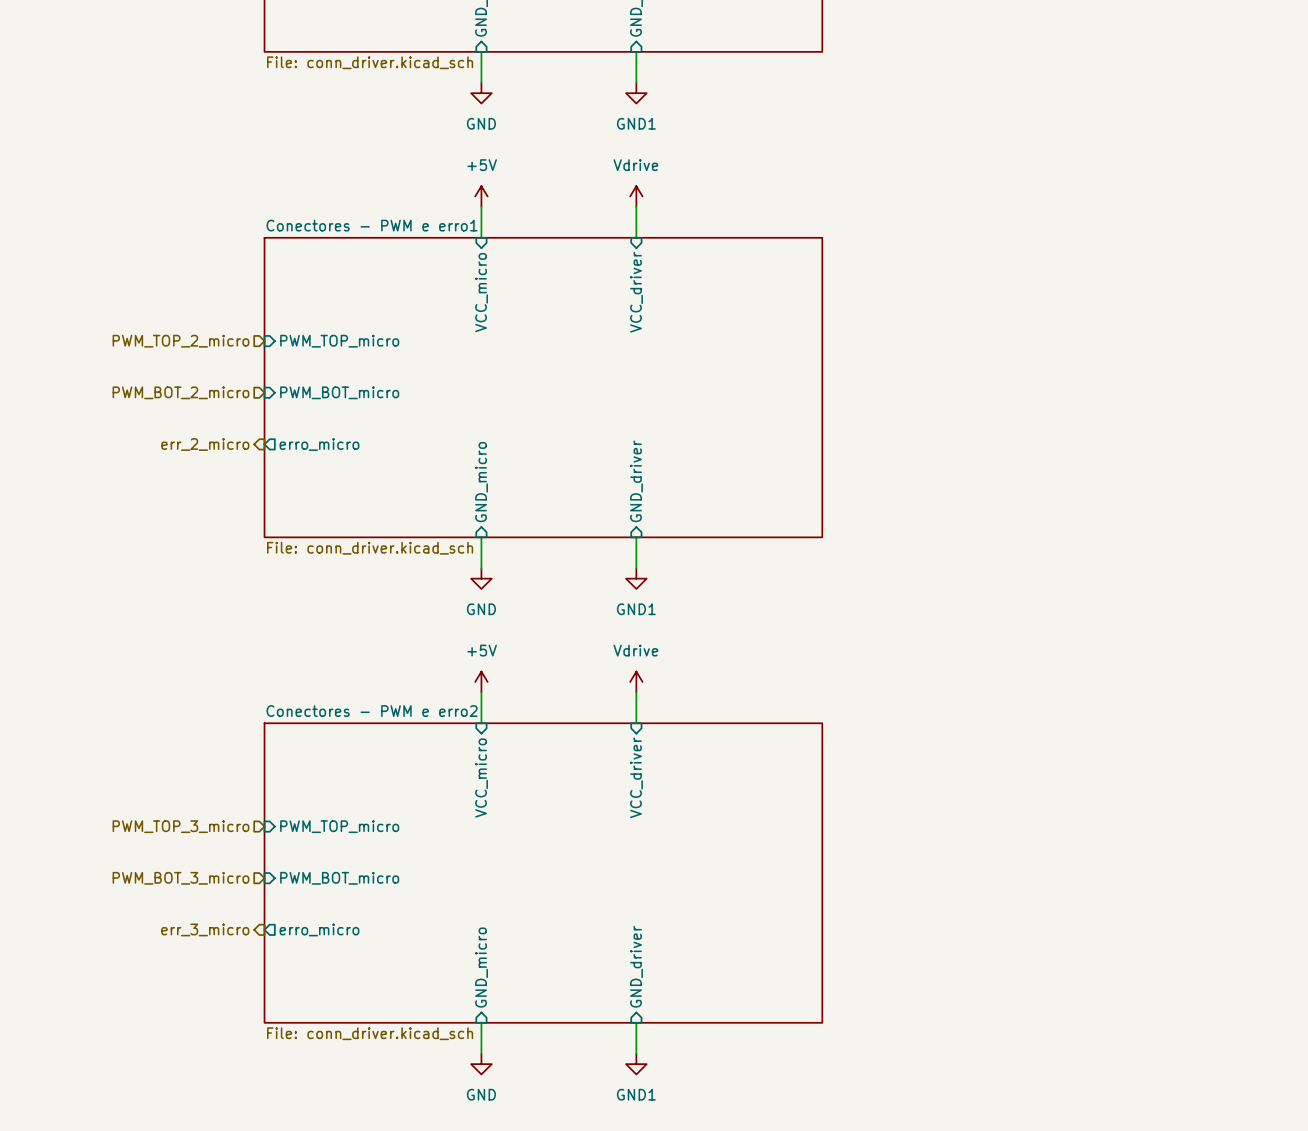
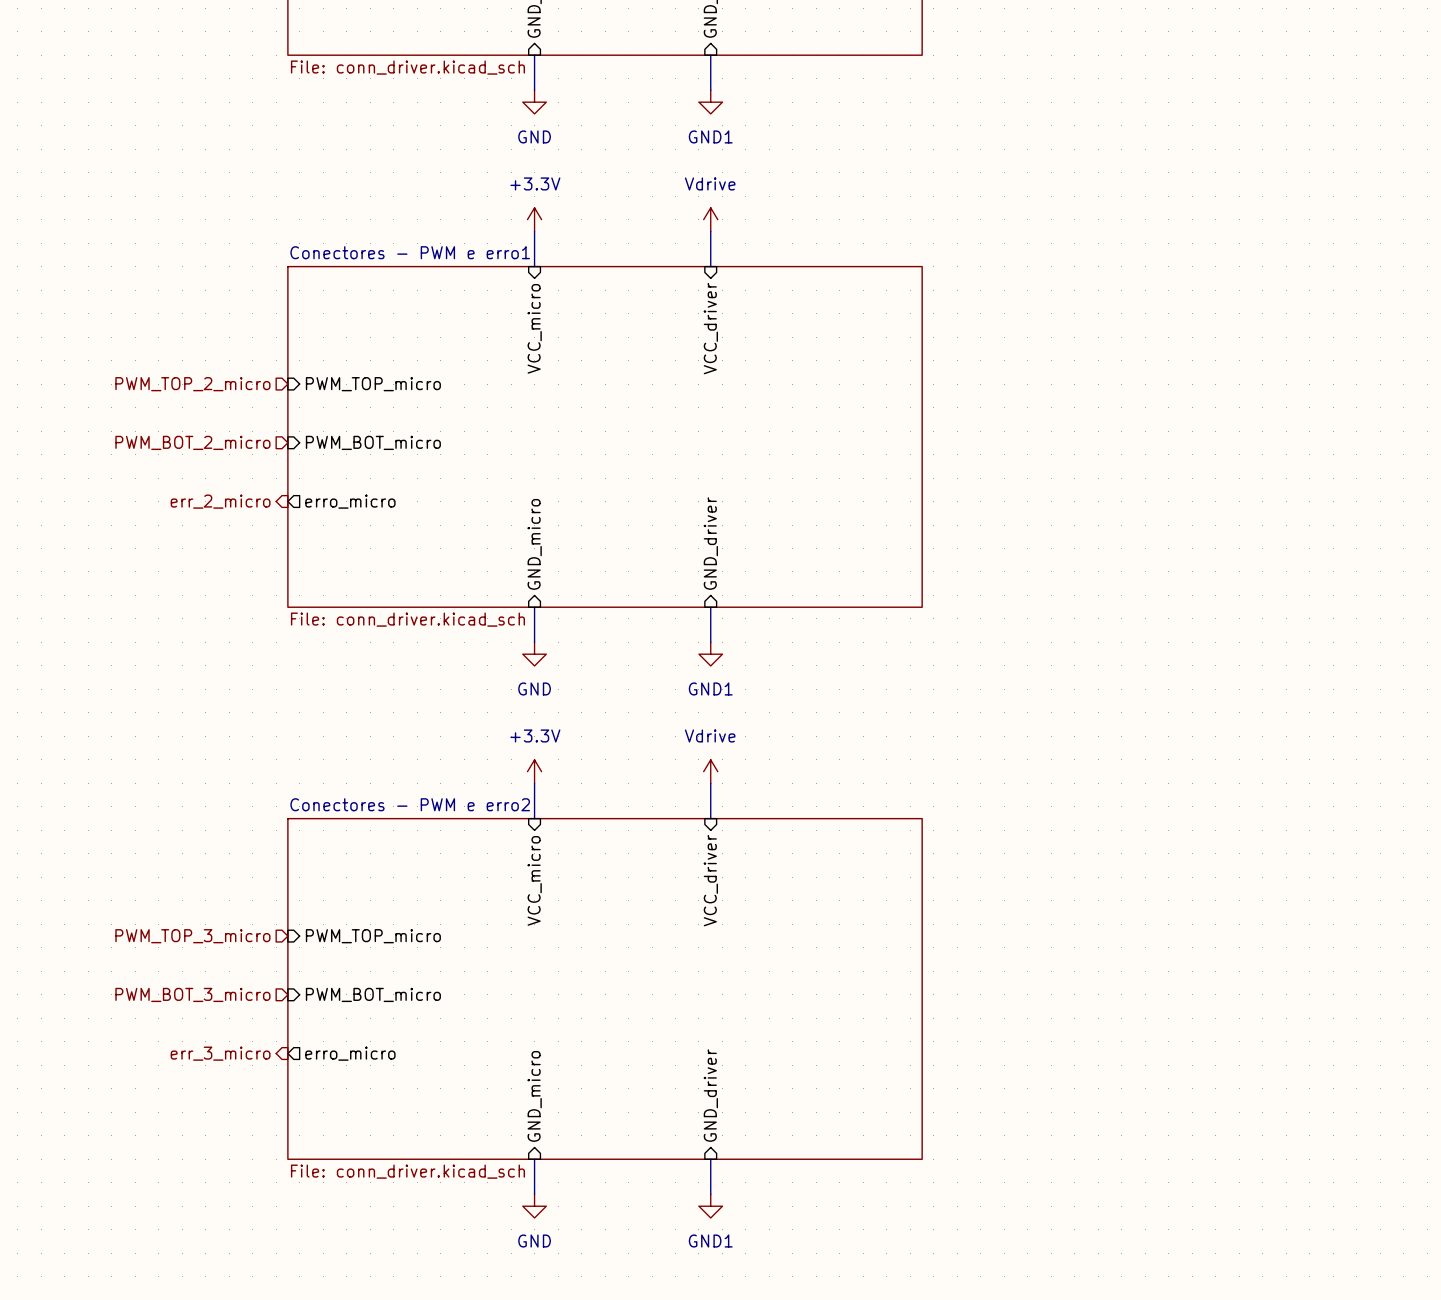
power symbol: +5V (481, 196) -> +3.3V (534, 219)
power symbol: +5V (481, 681) -> +3.3V (534, 771)

